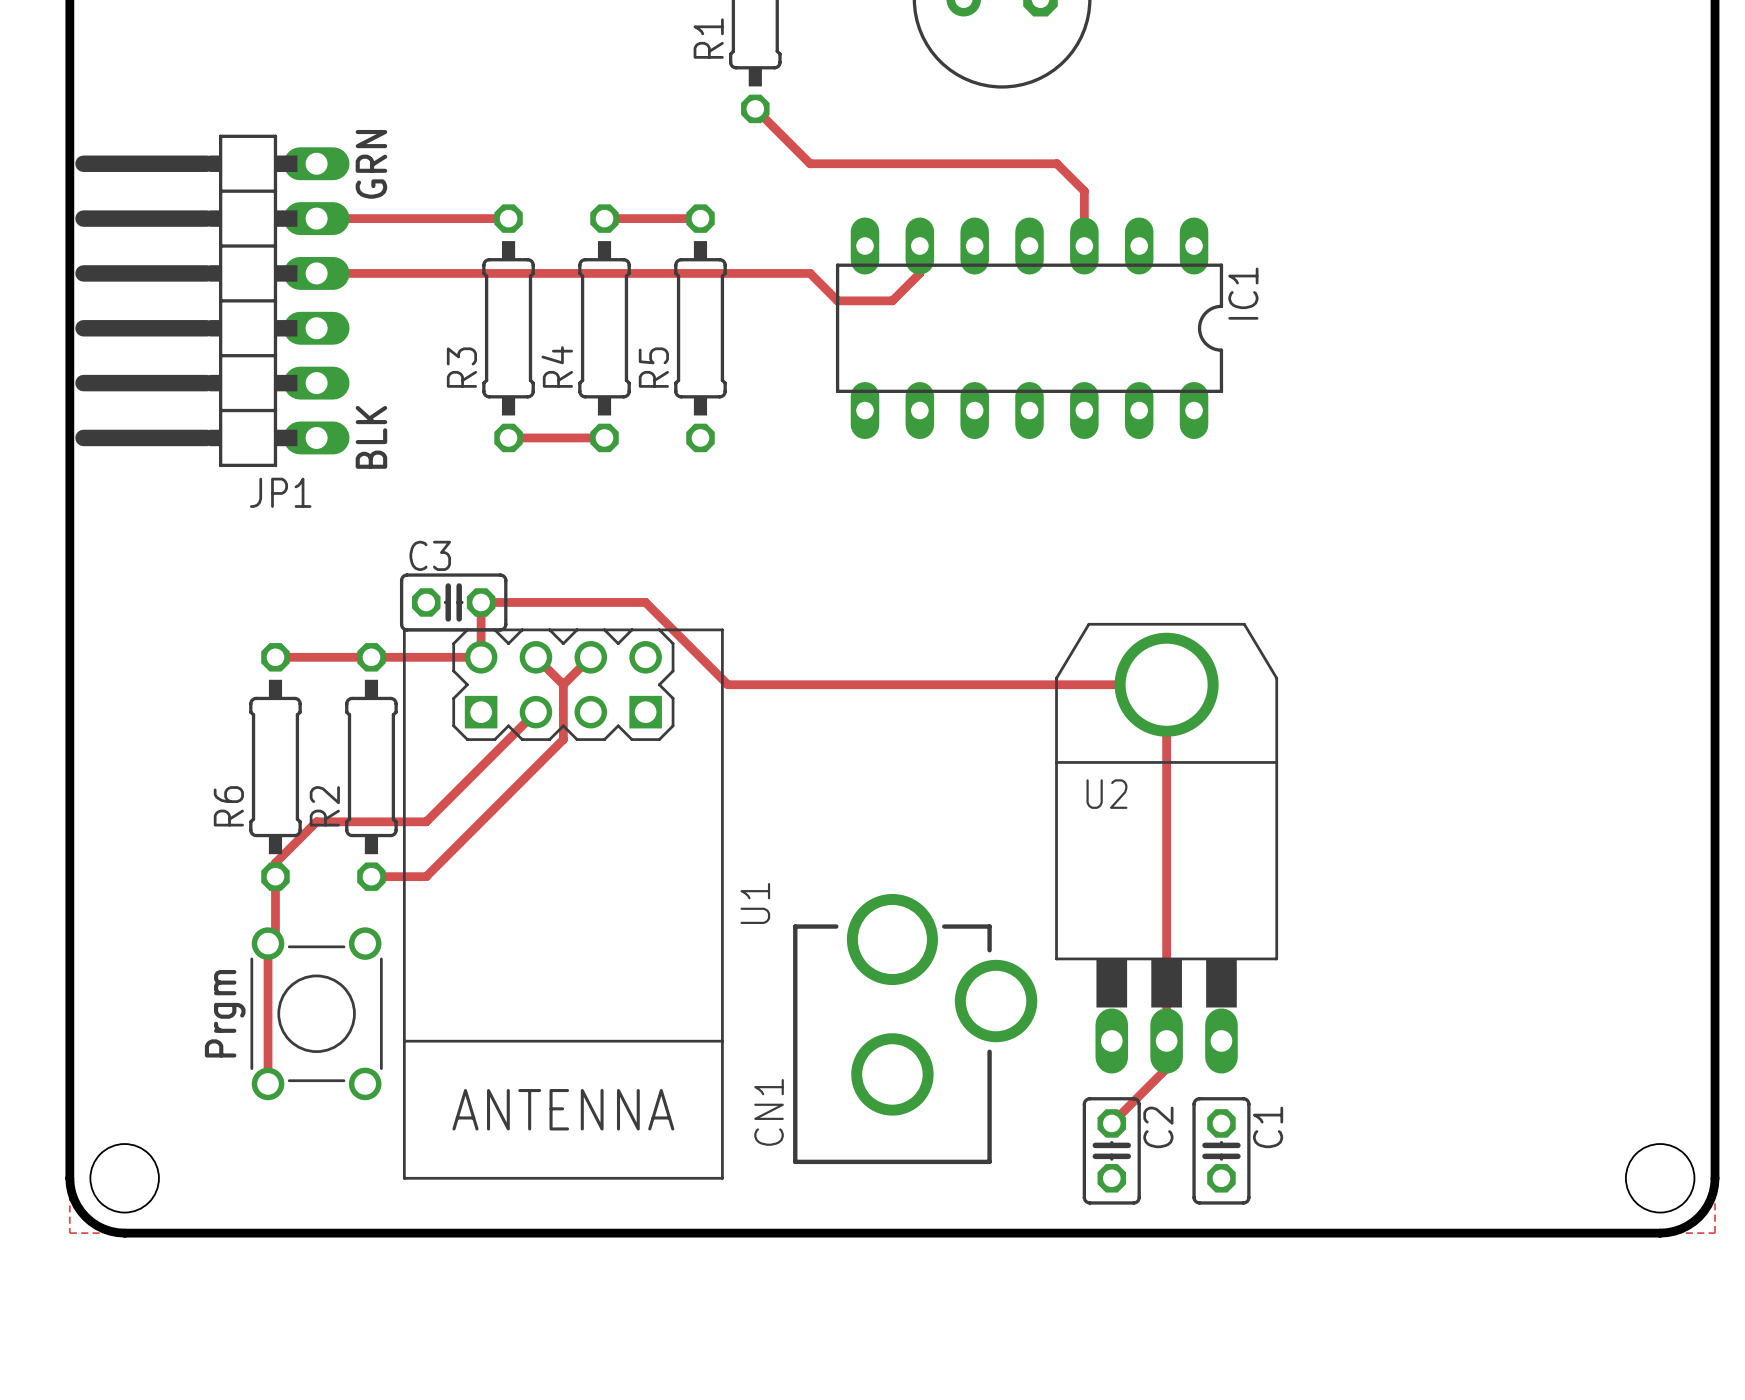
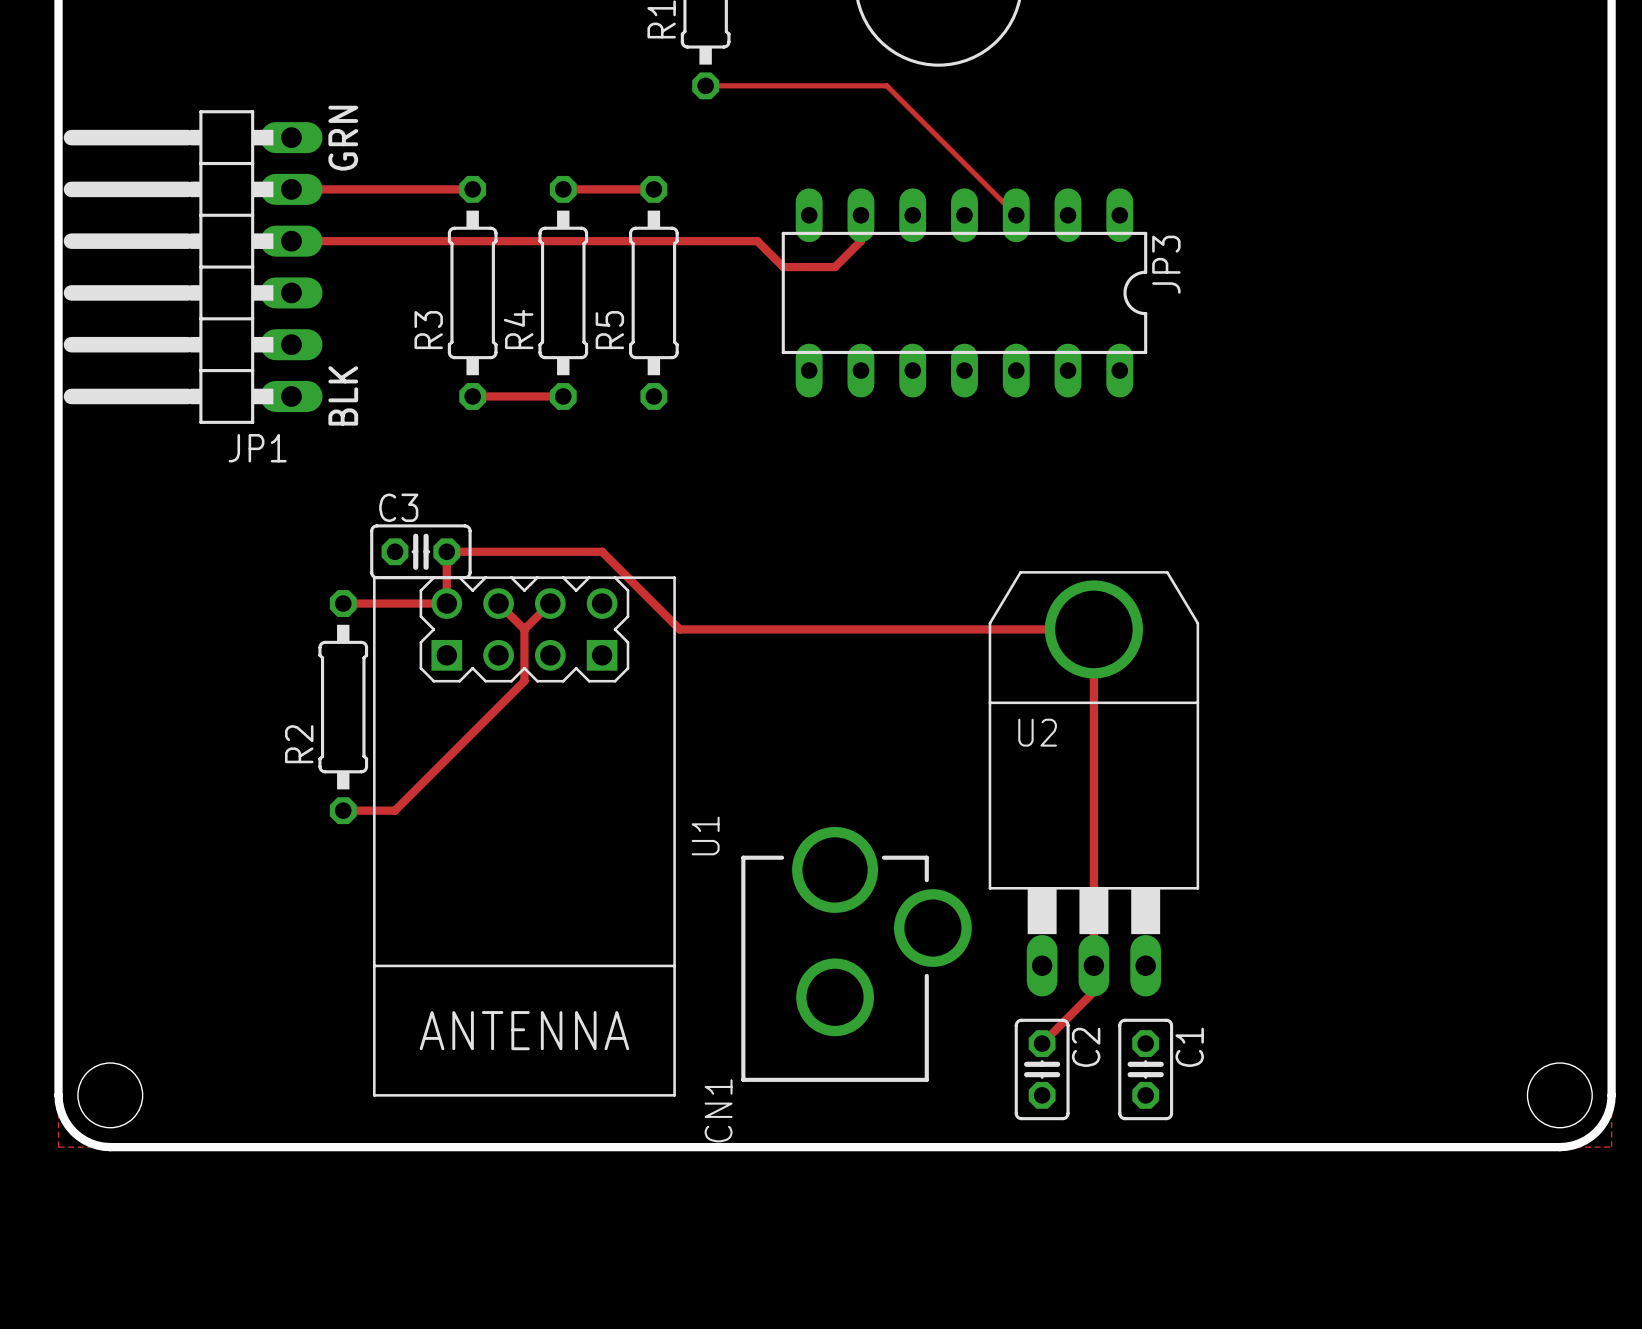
track: (755, 108) (810, 163) (1056, 163) (1084, 191) (1084, 246) -> (705, 85) (886, 85) (1016, 215)
IC1 name: IC1 (1243, 293) -> JP3 (1166, 264)
track: (275, 657) (371, 657) -> none
track: (535, 712) (426, 821) (316, 821) (275, 862) (275, 936) (268, 943) (268, 1083) -> none
R6: (275, 766) -> none
text: Prgm (225, 1013) -> none
part: (316, 1013) -> none
CN1 name position: CN1 (769, 1112) -> CN1 (718, 1110)

